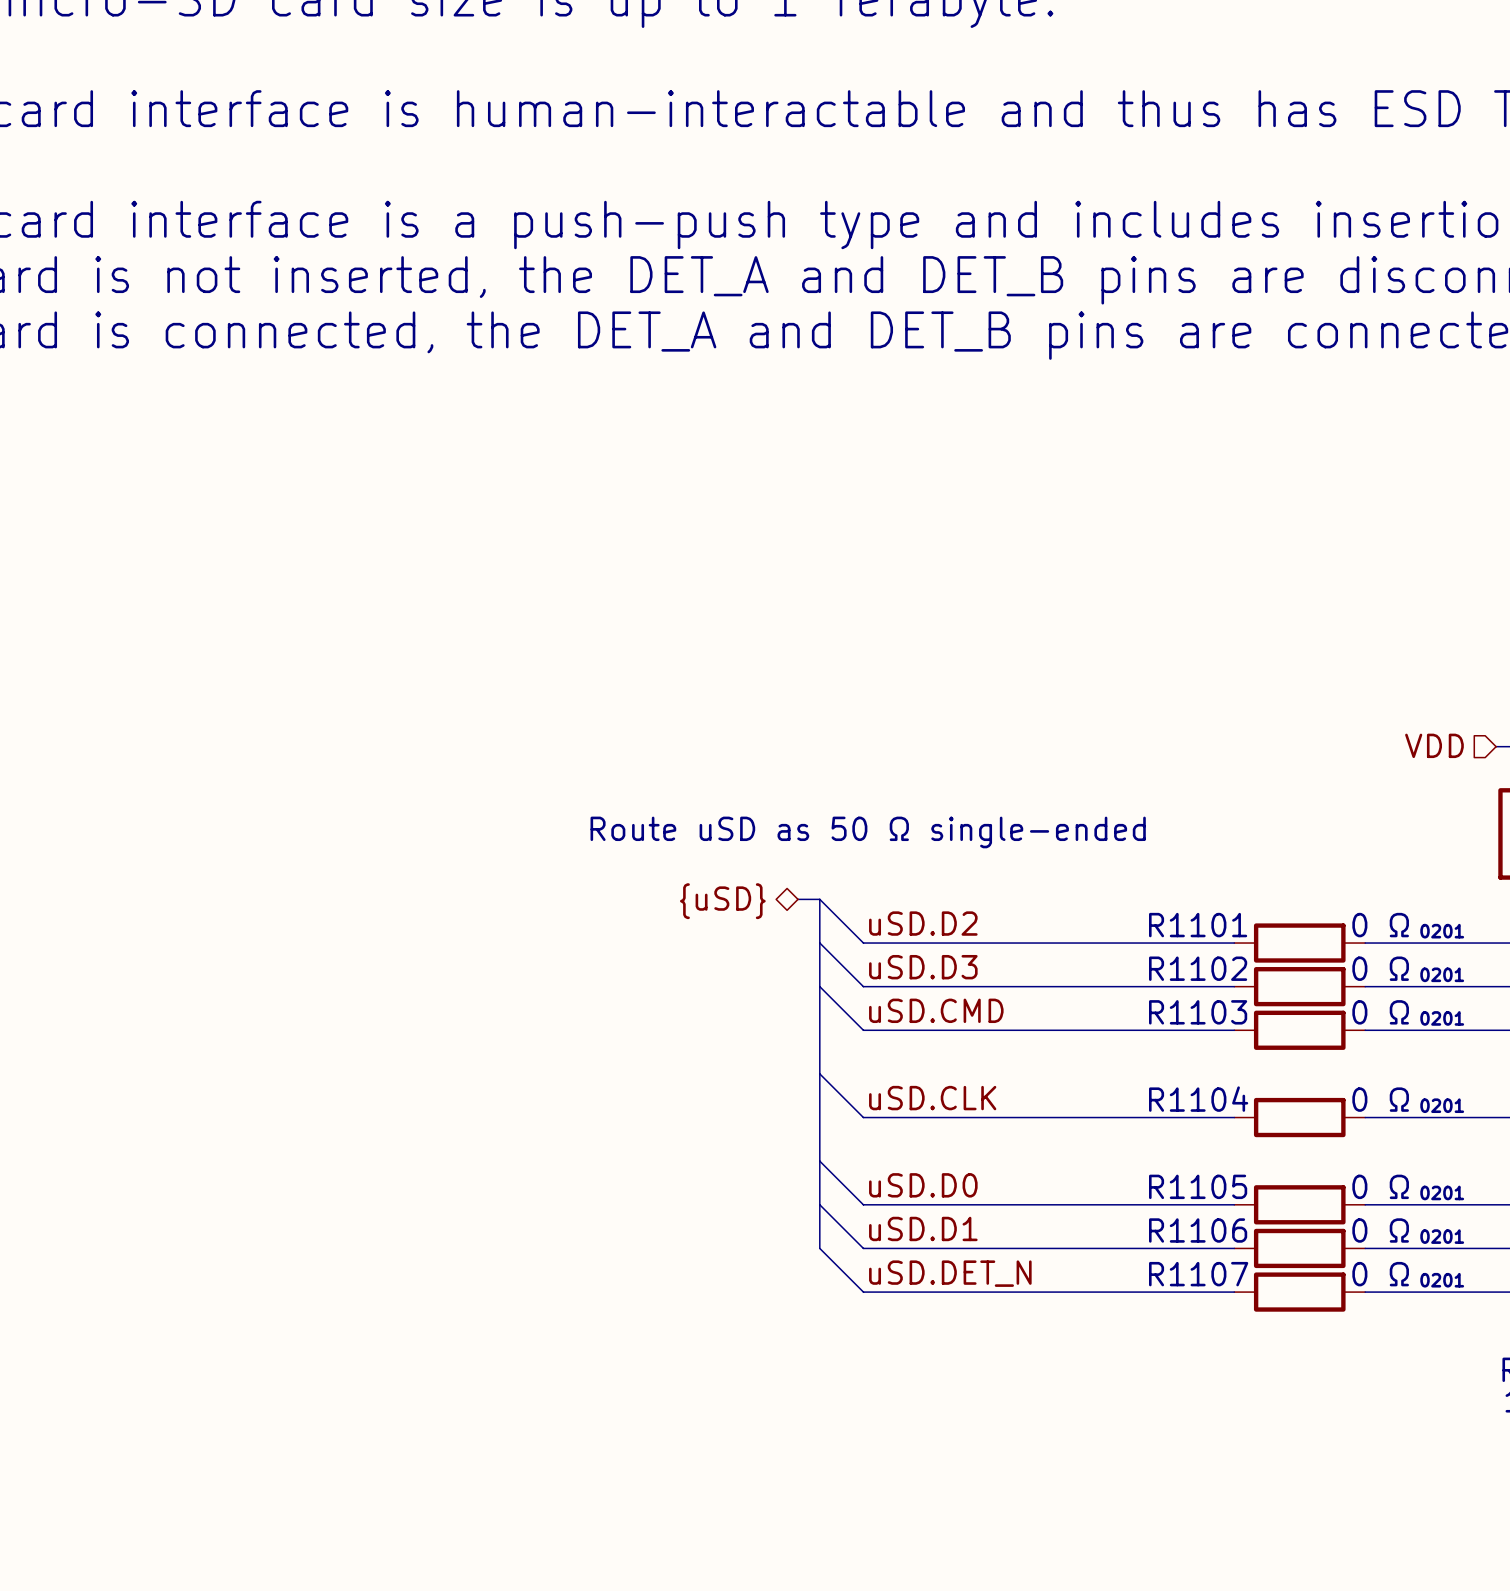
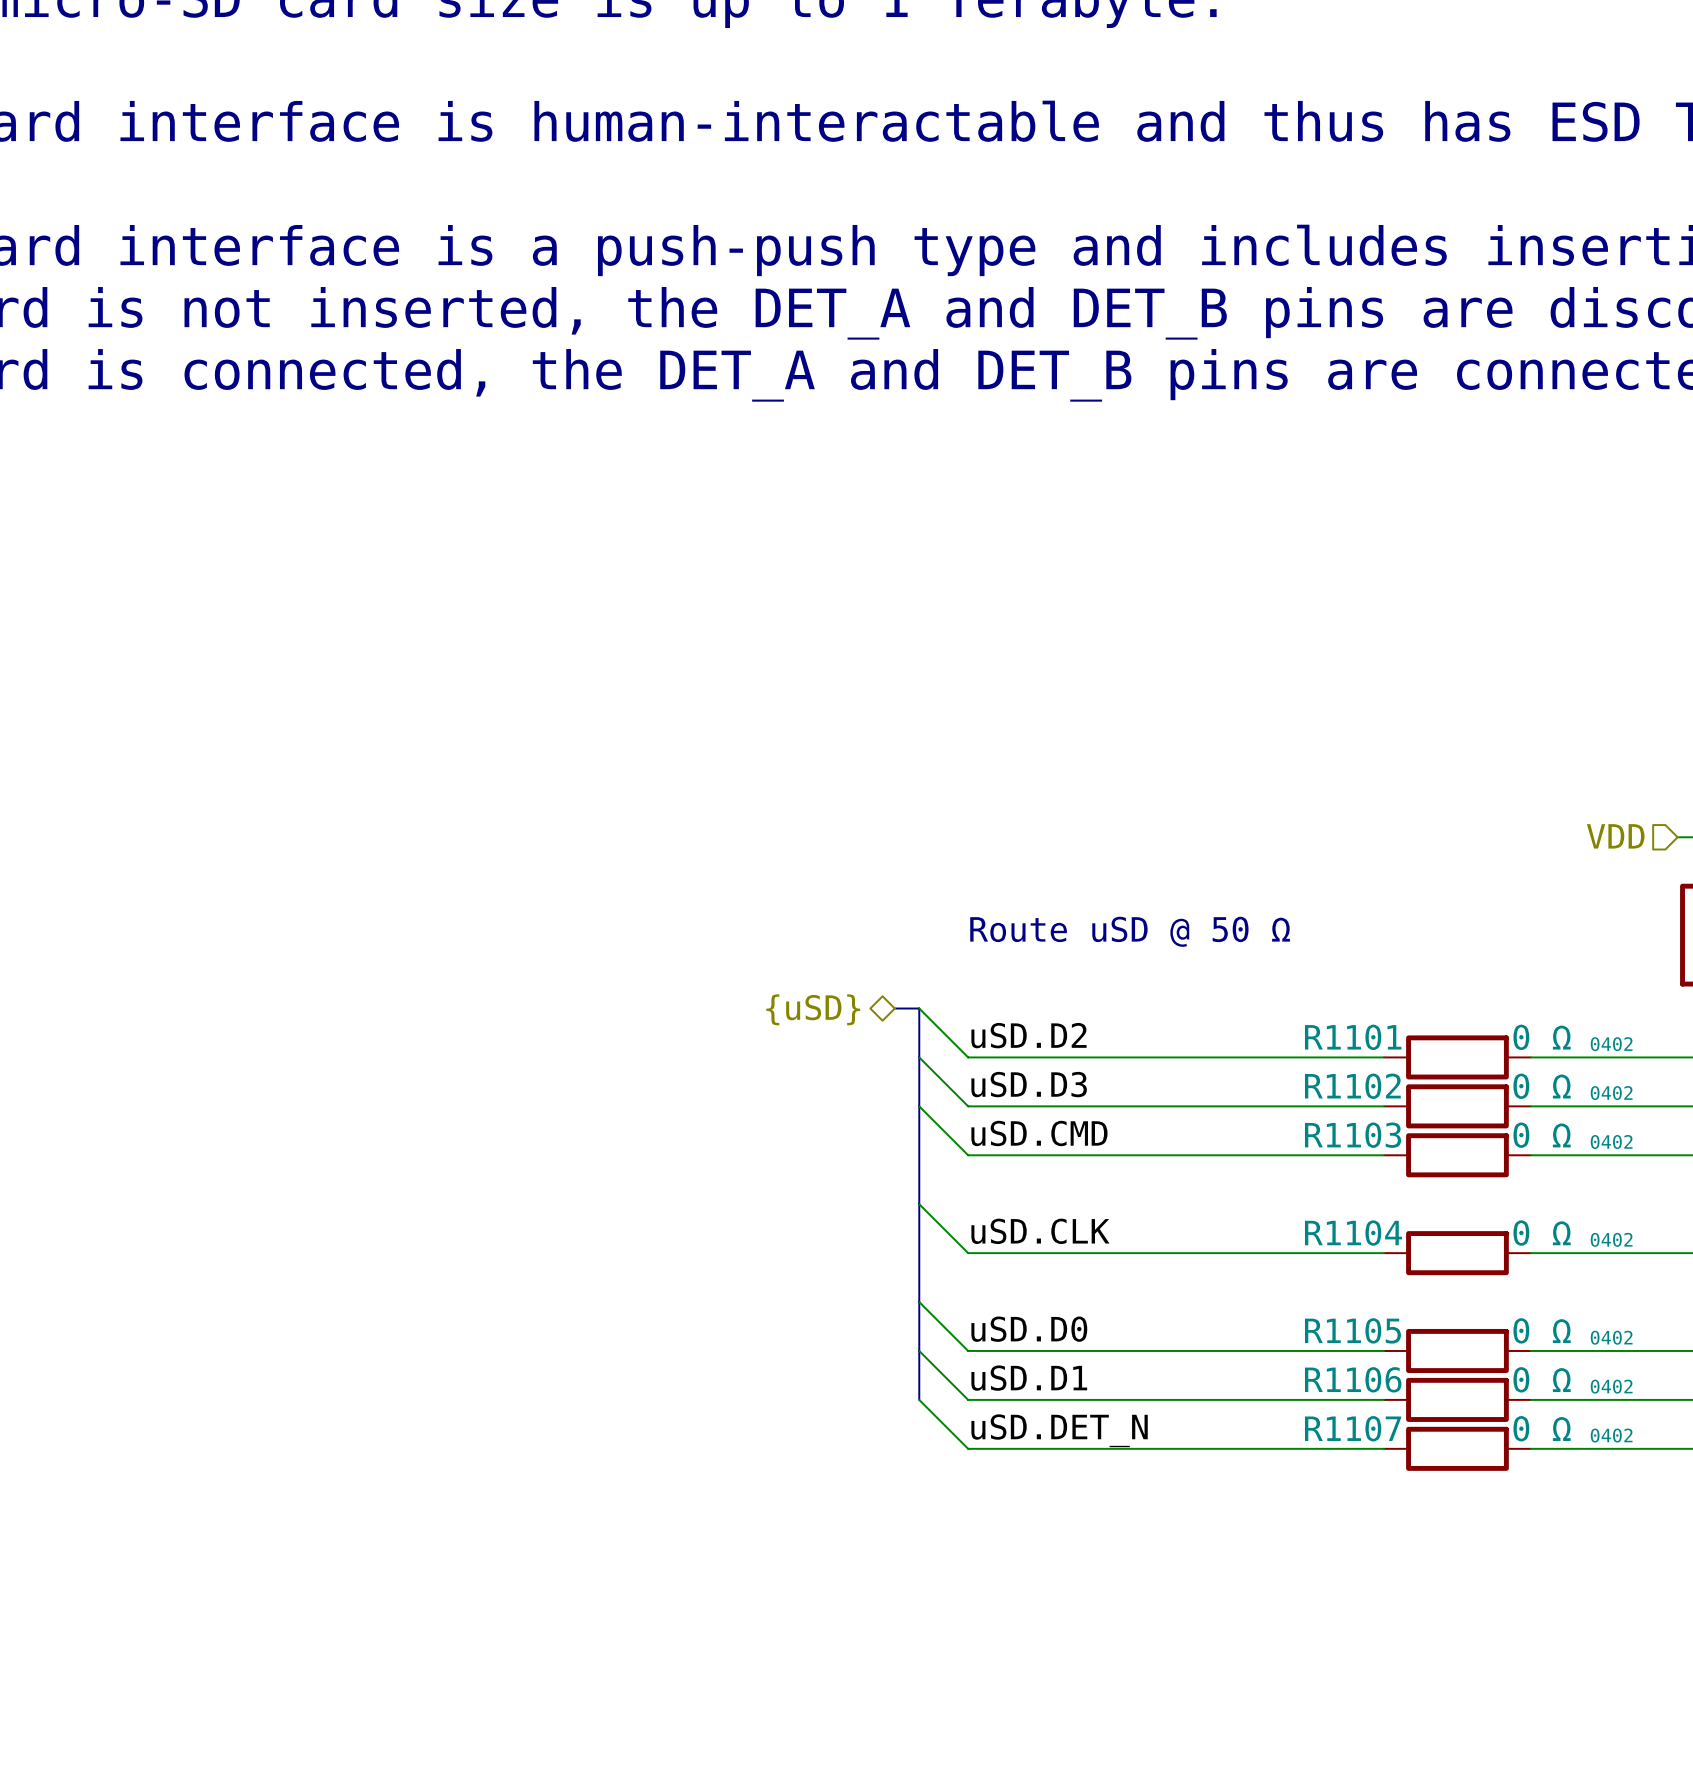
text: Route uSD as 50 Ω single-ended (868, 832) -> Route uSD @ 50 Ω (1130, 931)
R1101 text: 0201 (1442, 931) -> 0402 (1611, 1044)
R1102 text: 0201 (1442, 974) -> 0402 (1611, 1093)
R1103 text: 0201 (1442, 1018) -> 0402 (1611, 1142)
R1104 text: 0201 (1442, 1105) -> 0402 (1611, 1239)
R1105 text: 0201 (1442, 1192) -> 0402 (1611, 1337)
R1106 text: 0201 (1442, 1236) -> 0402 (1611, 1386)
R1107 text: 0201 (1442, 1280) -> 0402 (1611, 1435)

